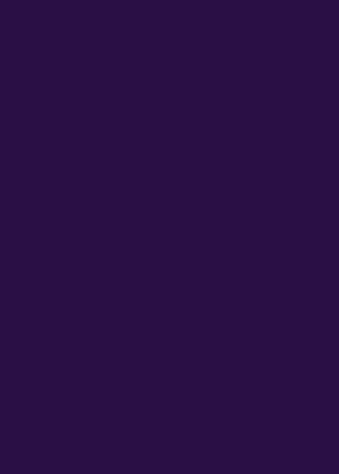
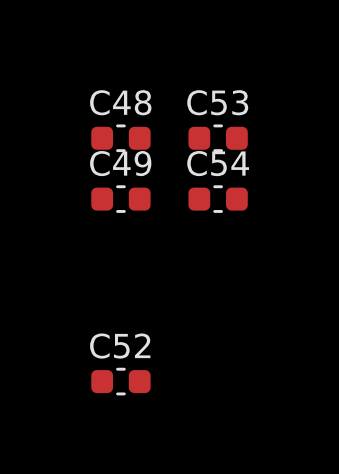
C48: none -> (120, 138)
C53: none -> (218, 138)
C49: none -> (120, 199)
C54: none -> (218, 199)
C52: none -> (120, 381)

